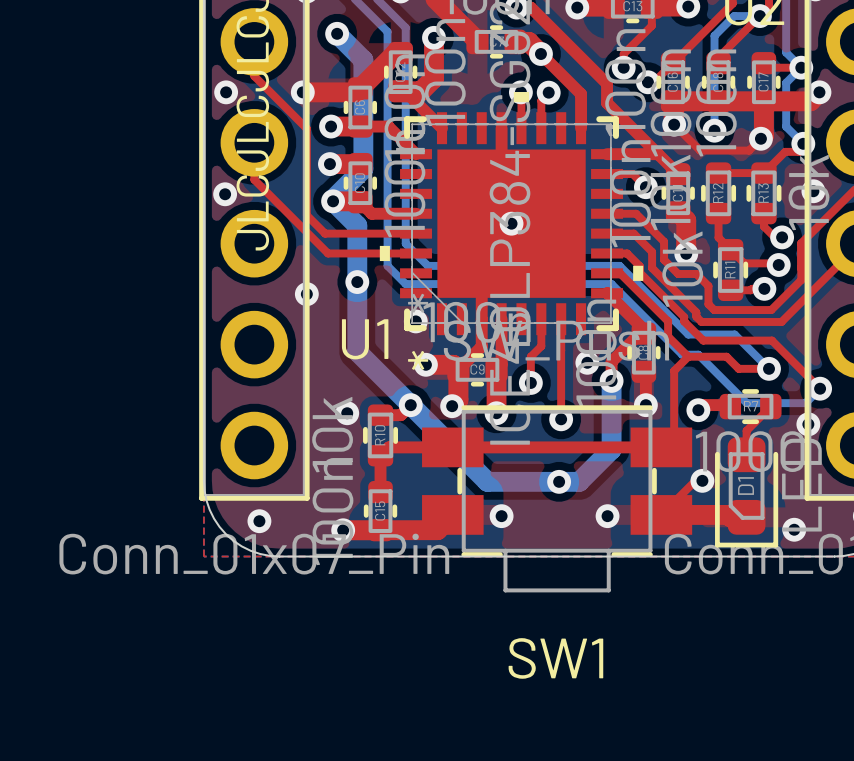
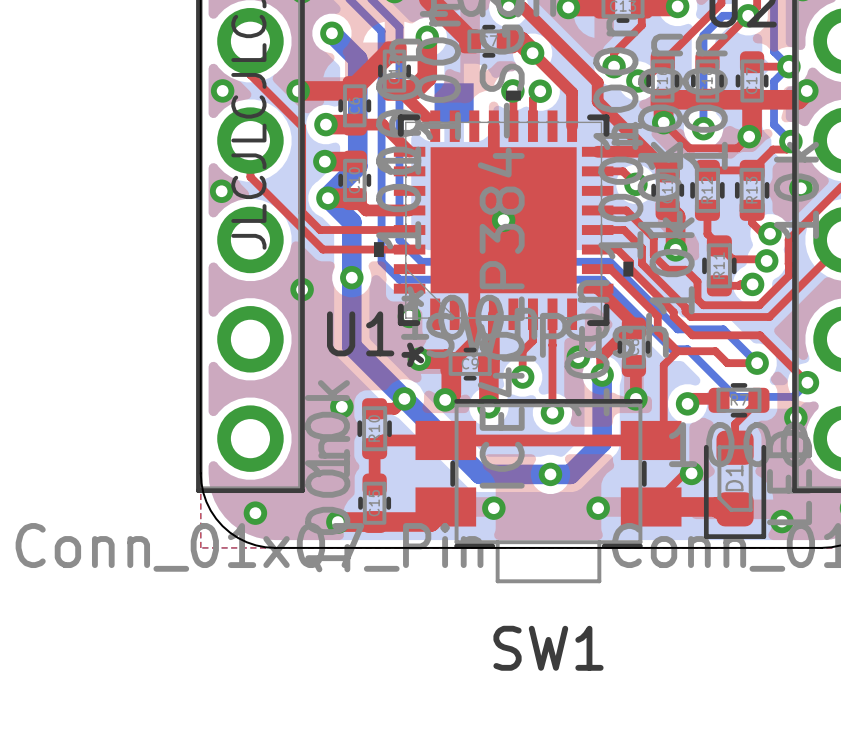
part: none -> (454, 102)

